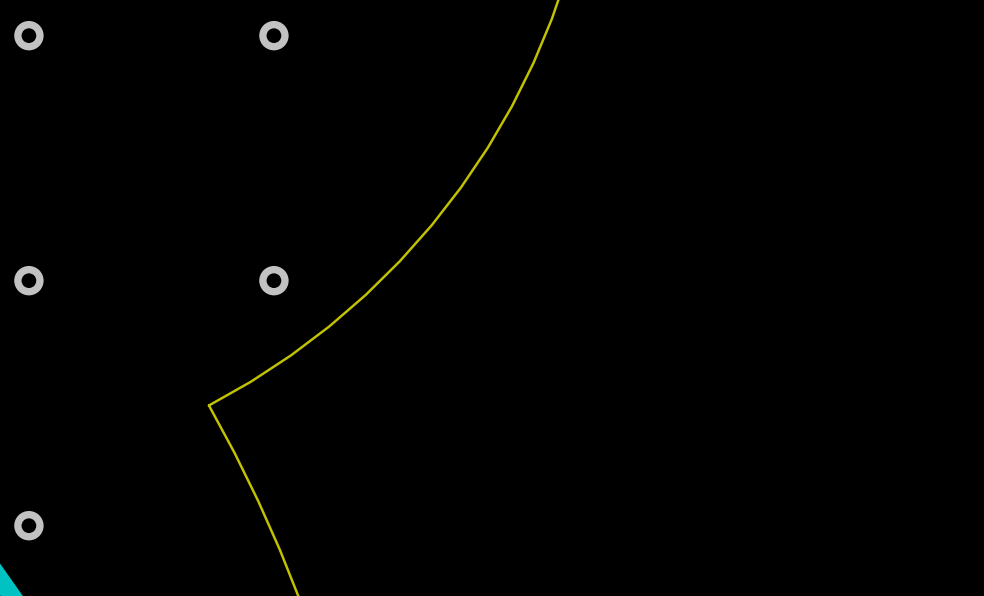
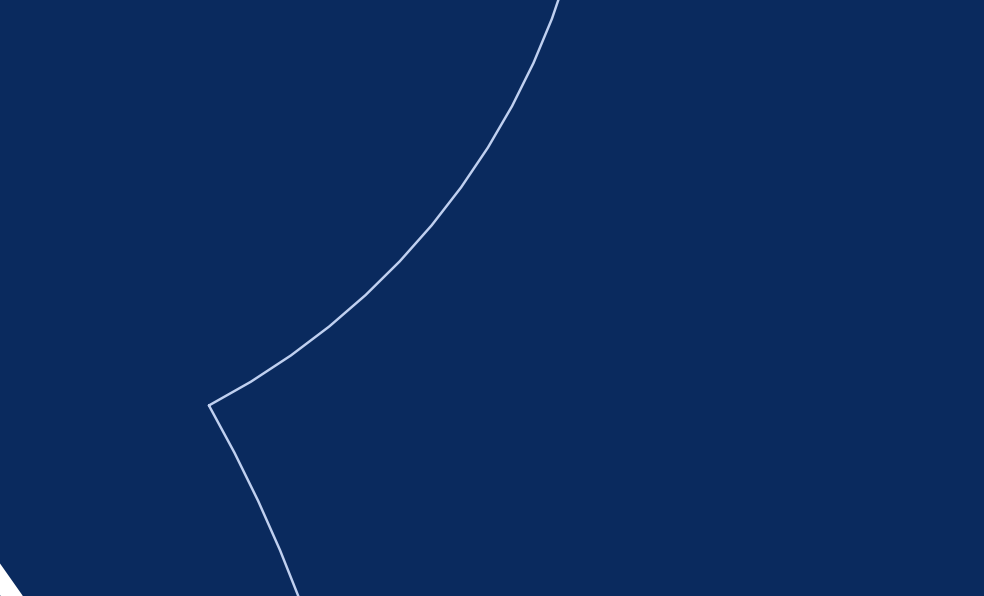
via: (28, 35) -> none
via: (273, 35) -> none
via: (28, 280) -> none
via: (273, 280) -> none
via: (28, 525) -> none

